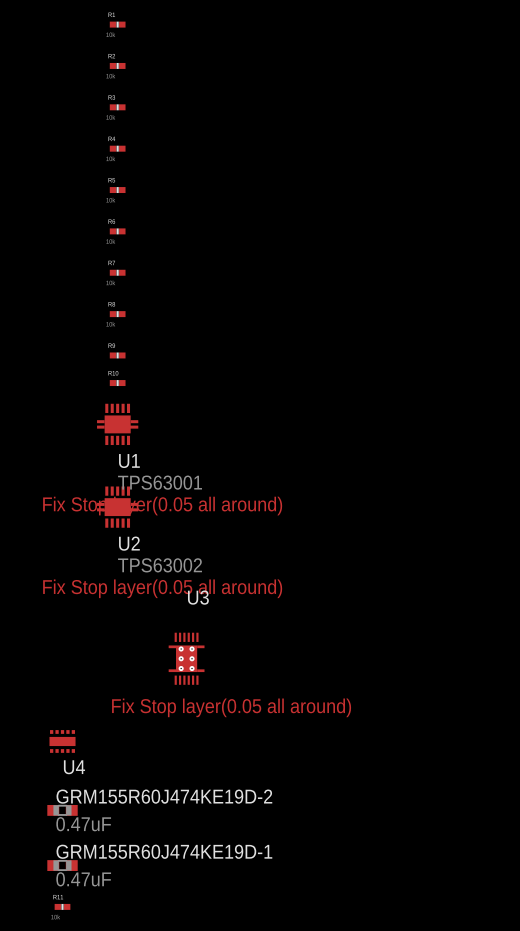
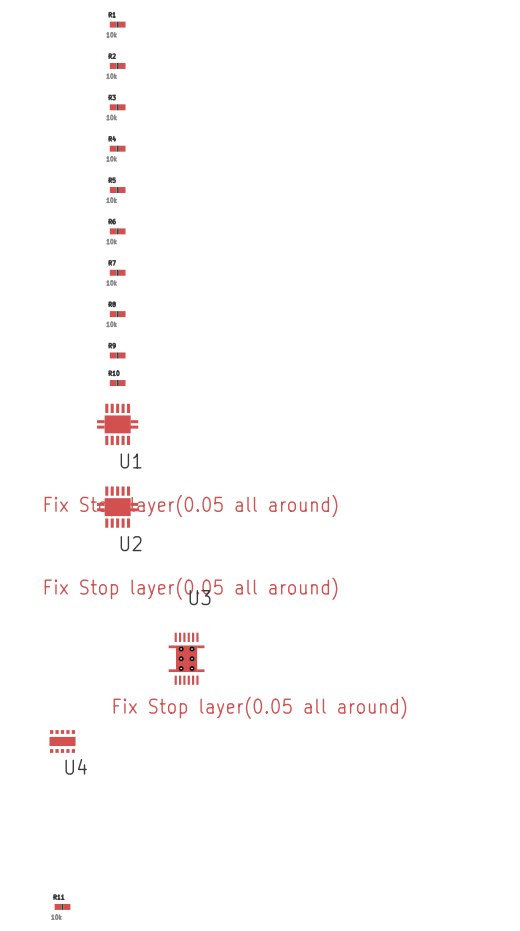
U1 value: TPS63001 (160, 482) -> none
U2 value: TPS63002 (160, 565) -> none
GRM155R60J474KE19D-2: 0.47uF (62, 810) -> none
GRM155R60J474KE19D-1: 0.47uF (62, 865) -> none

